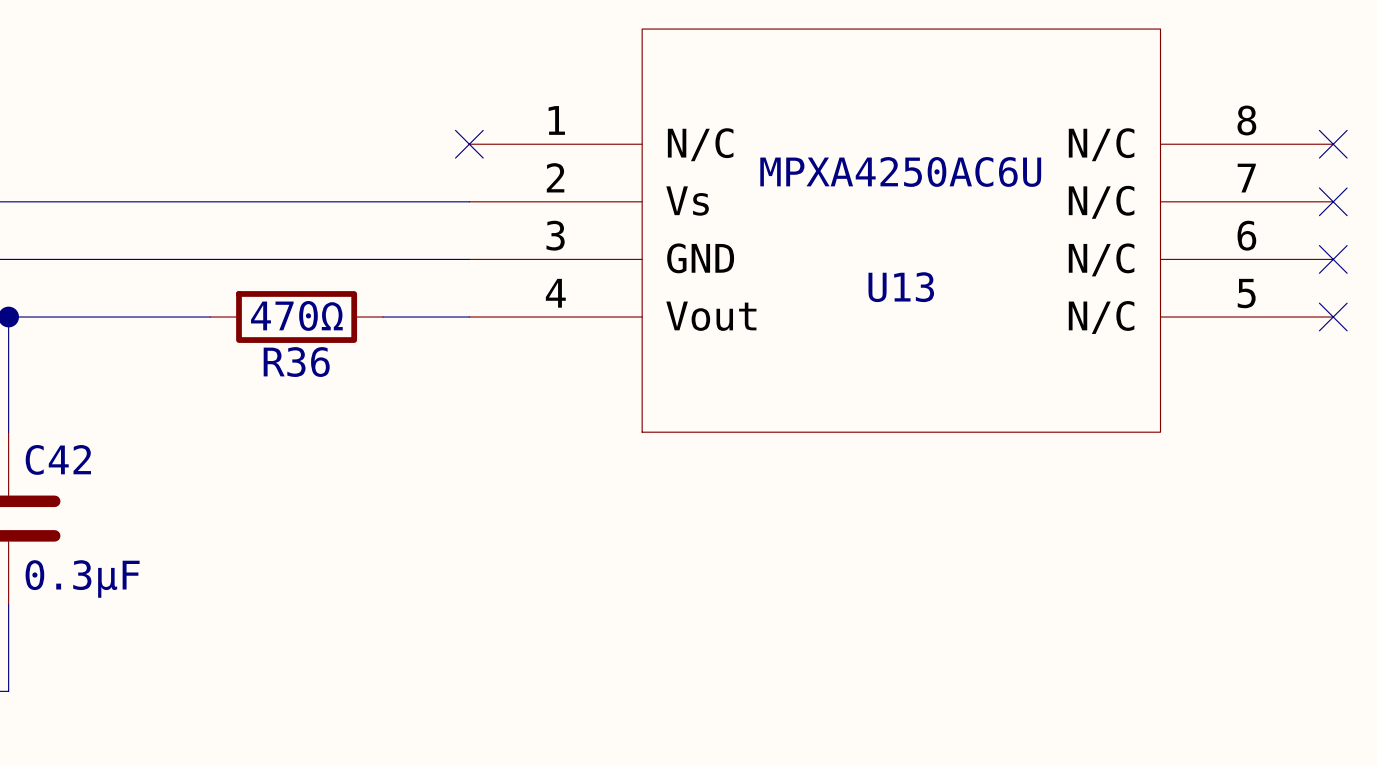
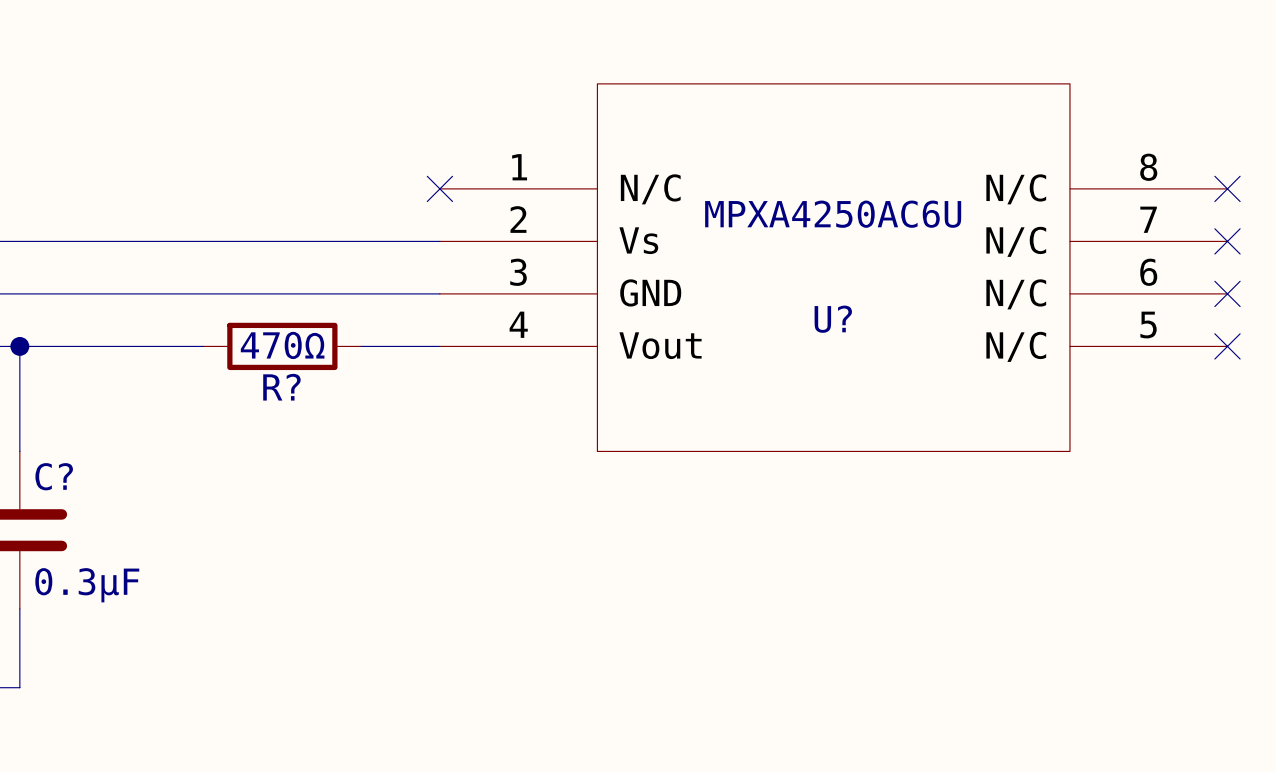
U13 name: U13 (901, 287) -> U? (833, 319)
R36 name: R36 (296, 362) -> R? (281, 387)
C42 name: C42 (58, 459) -> C? (54, 476)

